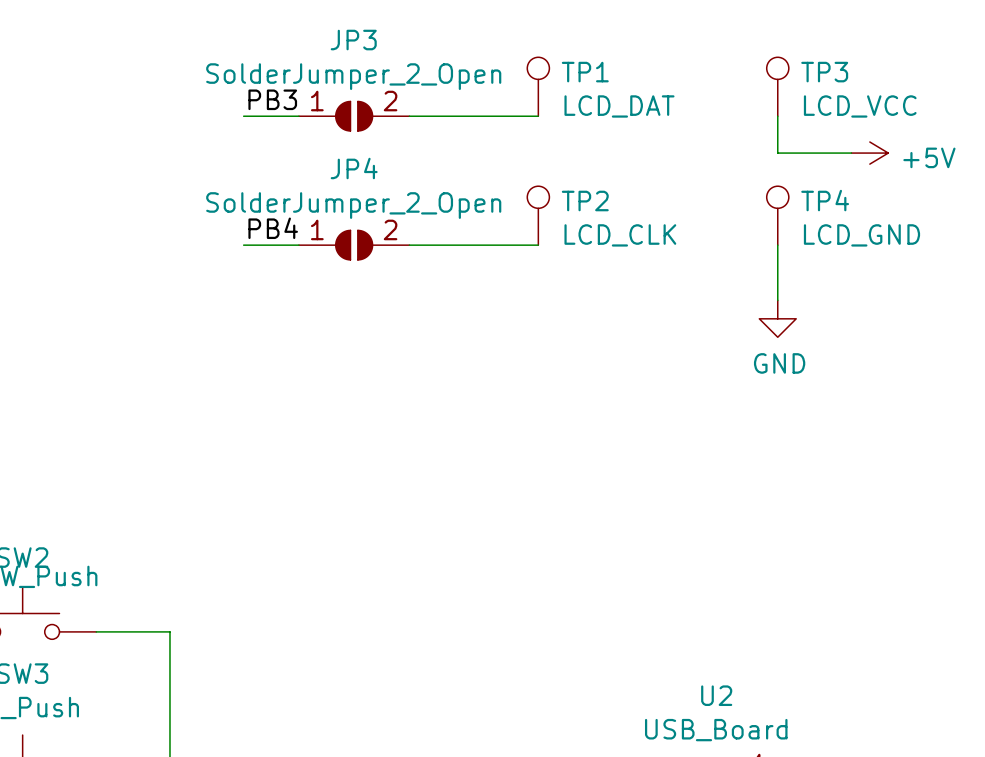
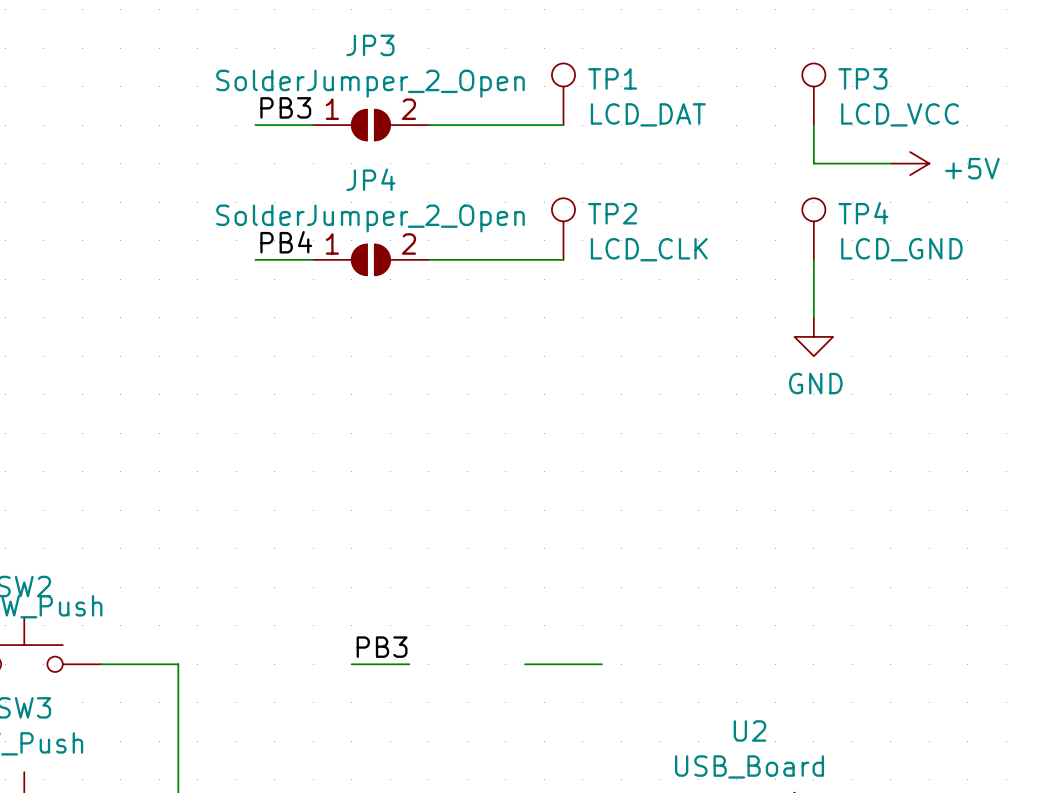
label: none -> PB3 (382, 647)
wire: none -> (351, 664) (409, 664)
wire: none -> (524, 664) (602, 664)

